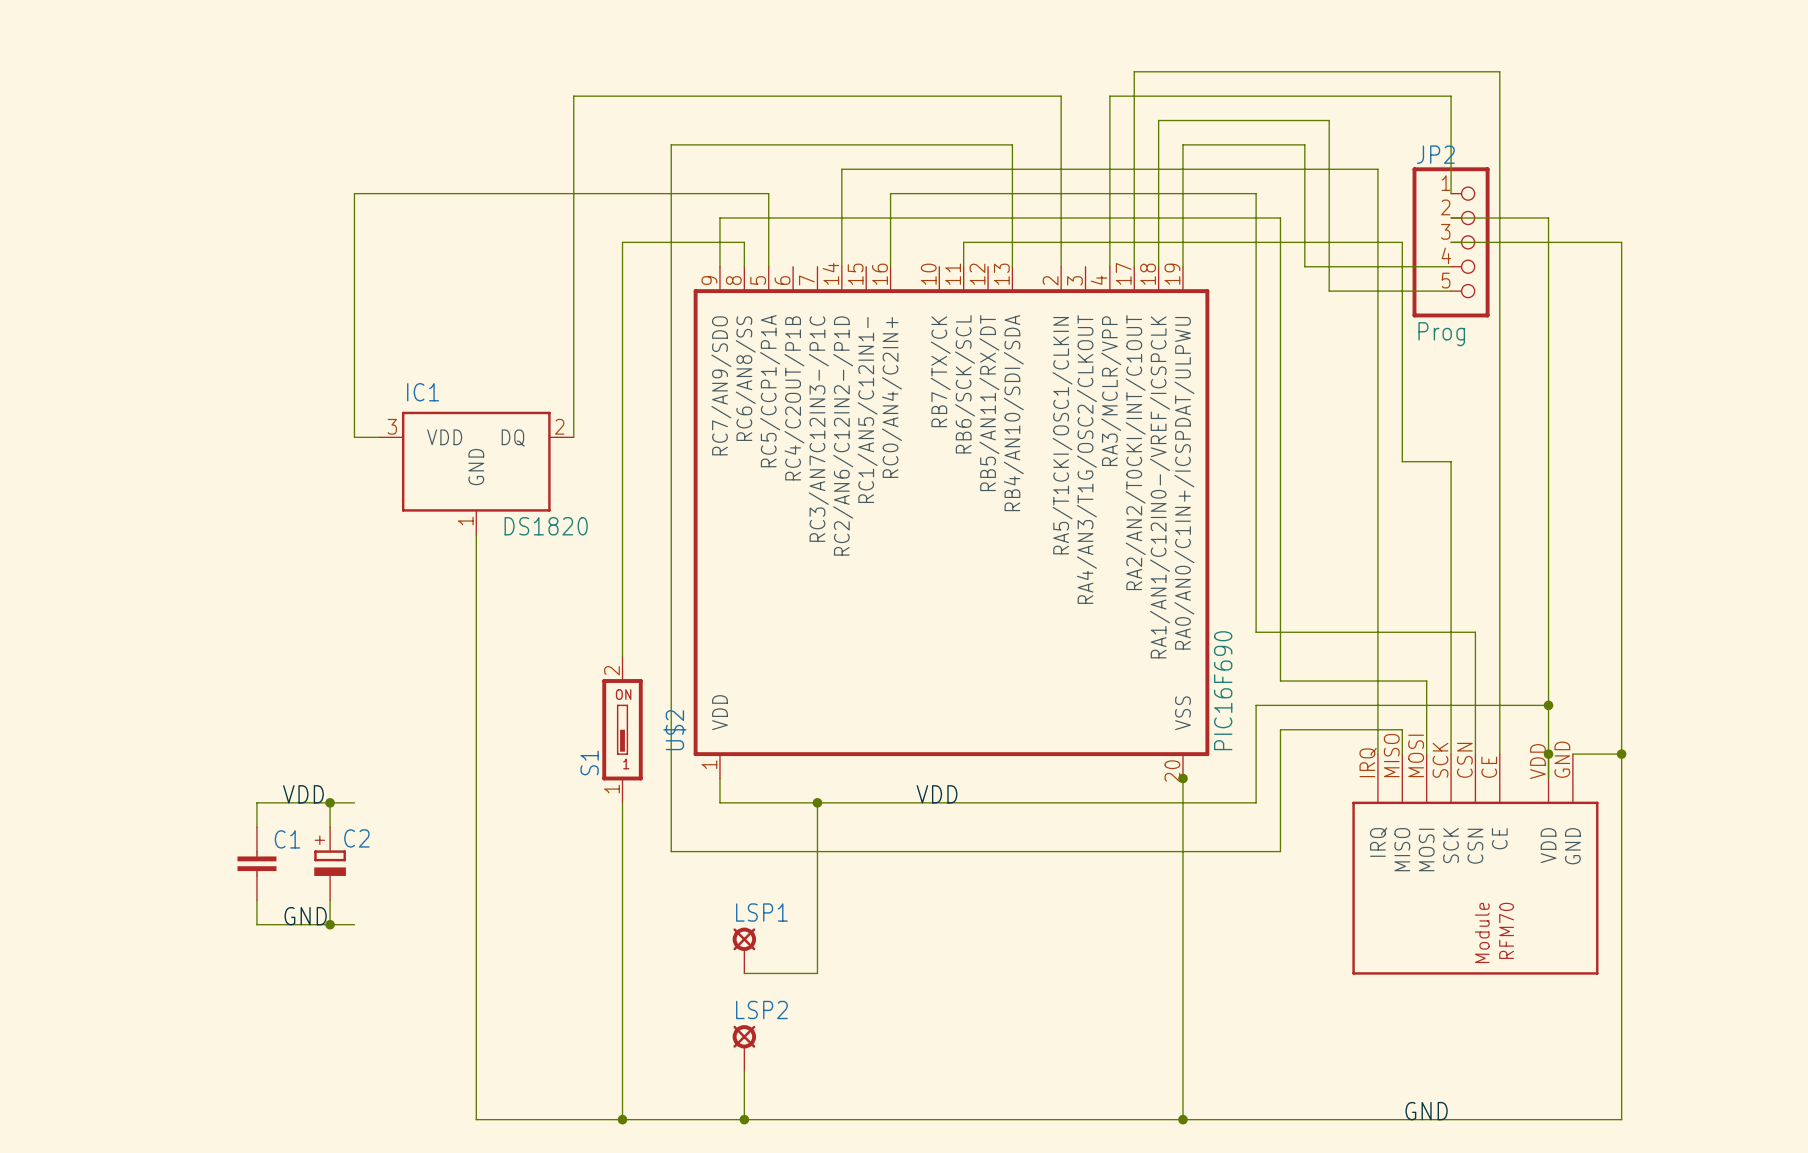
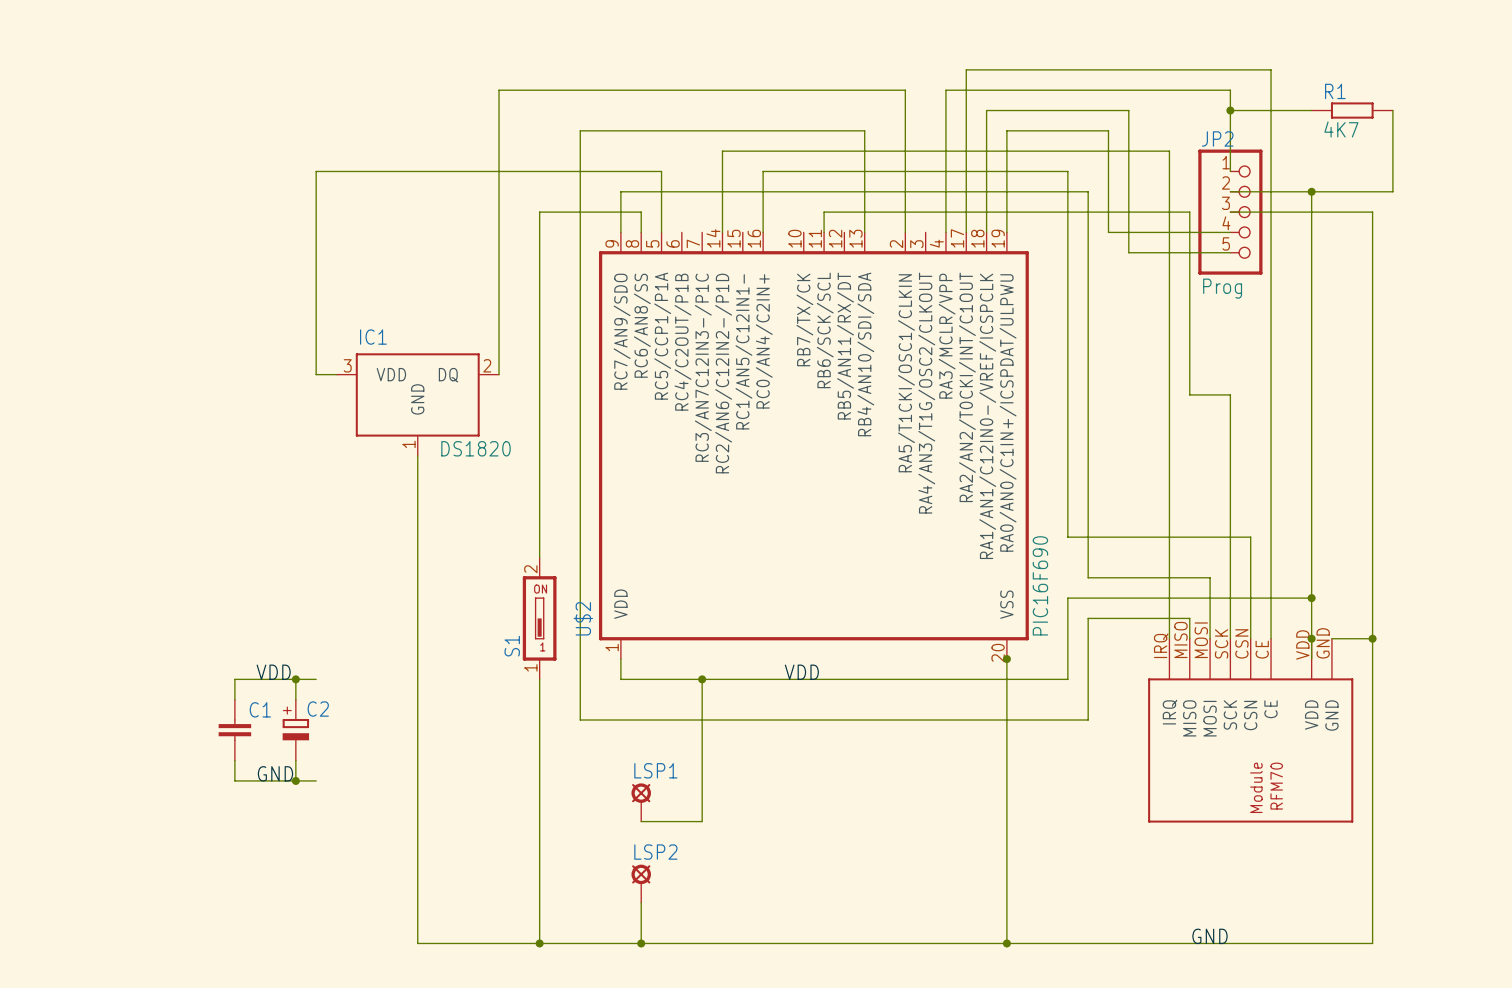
wire: none -> (1230, 110) (1311, 110)
junction: none -> (1230, 110)
R1: none -> 4K7 (1352, 110)
wire: none -> (1392, 110) (1392, 191) (1311, 191)
junction: none -> (1311, 191)

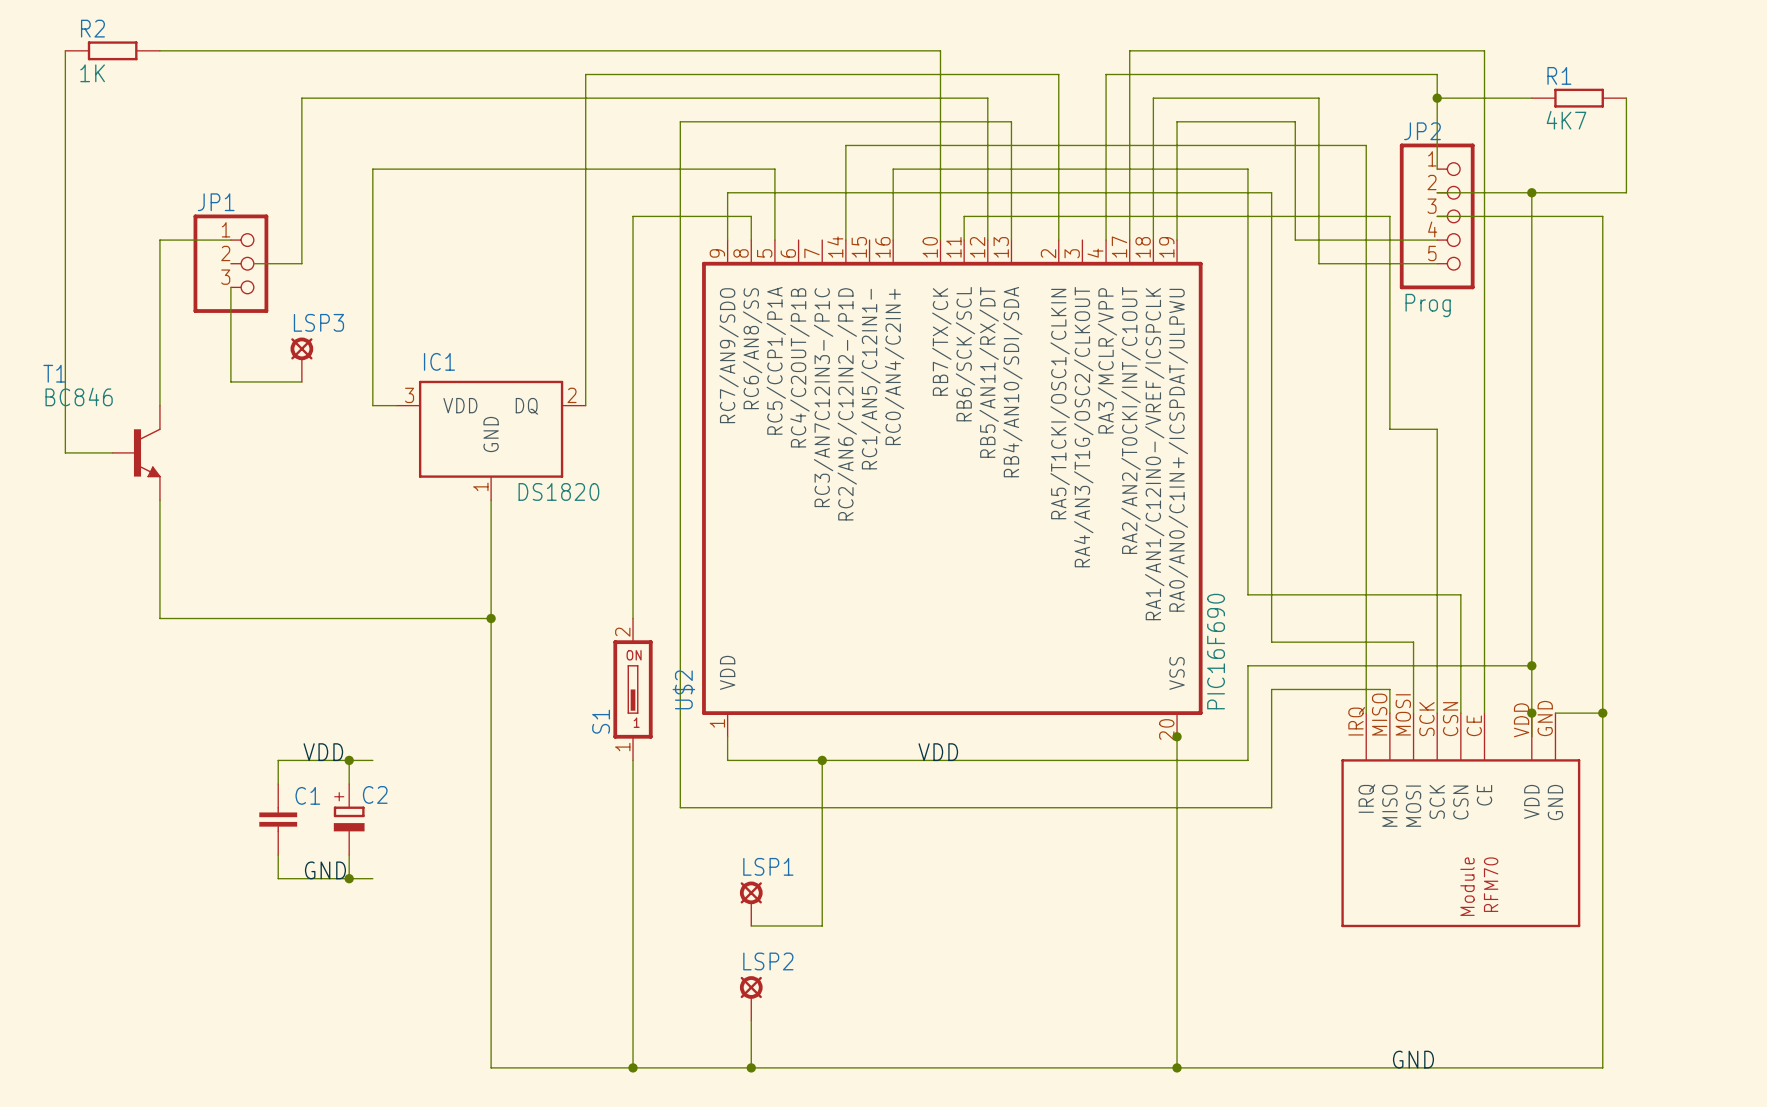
wire: none -> (65, 50) (65, 452) (112, 452)
R2: none -> 1K (112, 50)
wire: none -> (159, 50) (940, 50) (940, 240)
wire: none -> (230, 240) (159, 240) (159, 405)
wire: none -> (987, 240) (987, 98) (301, 98) (301, 263) (254, 263)
JP1: none -> (230, 263)
wire: none -> (230, 287) (230, 381) (301, 381)
LSP3: none -> (301, 359)
T1: none -> BC846 (136, 452)
wire: none -> (159, 500) (159, 618) (491, 618)
junction: none -> (491, 618)

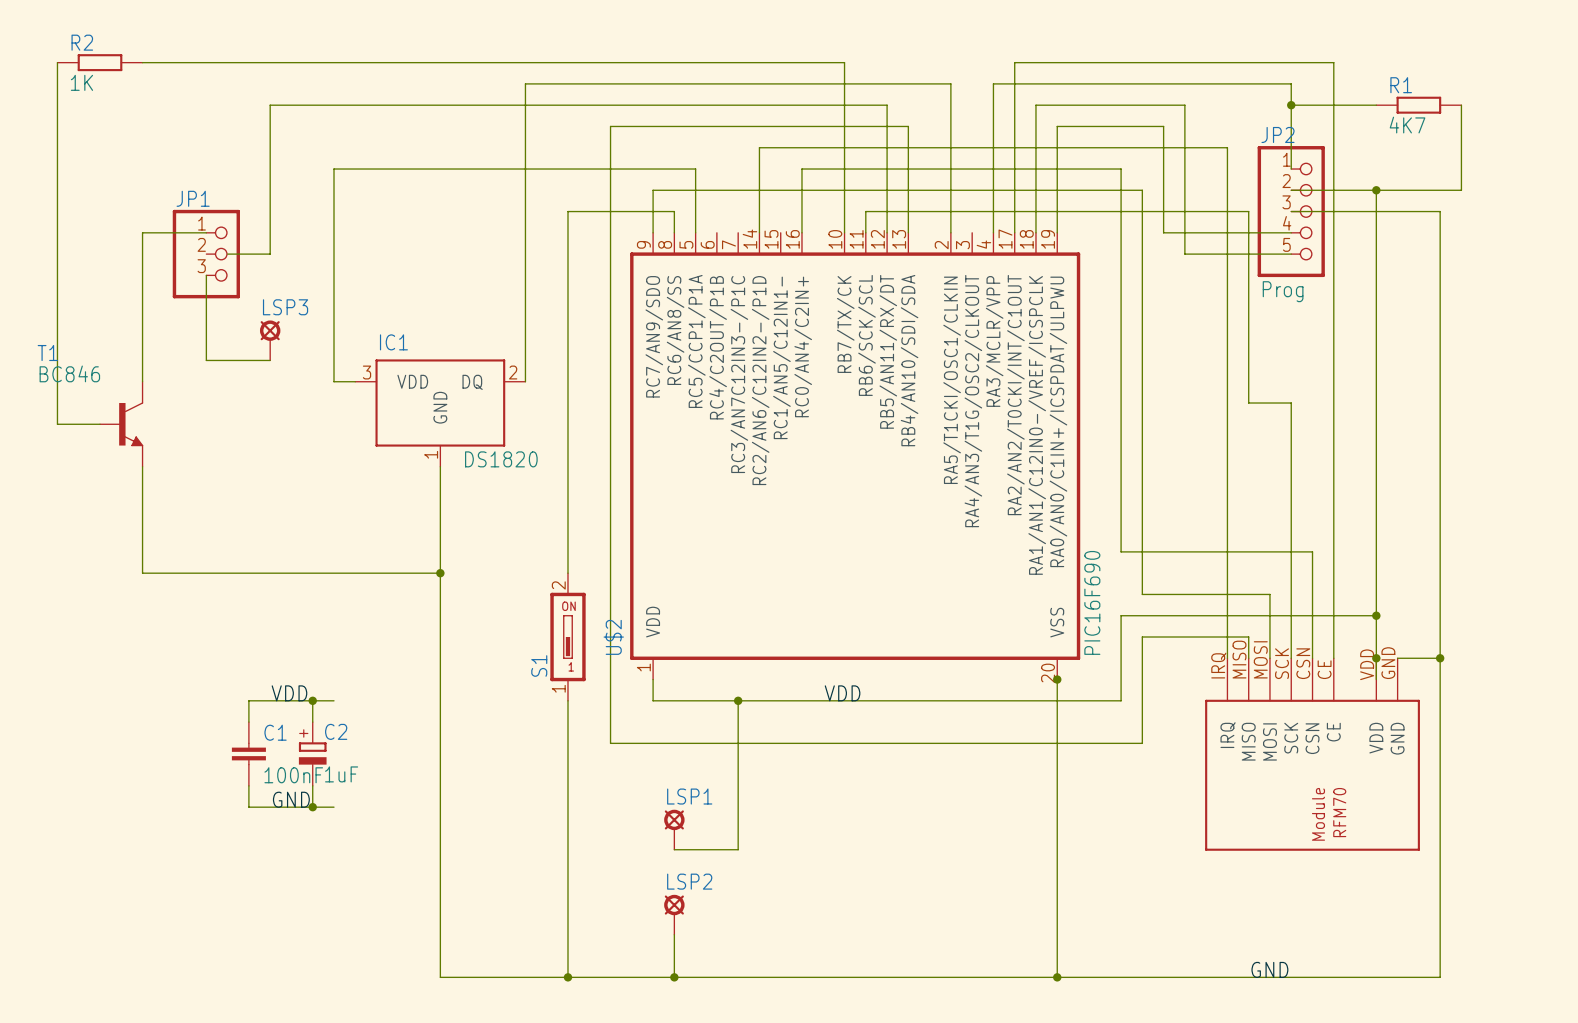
C2 value: none -> 1uF (341, 774)
C1 value: none -> 100nF (293, 775)

